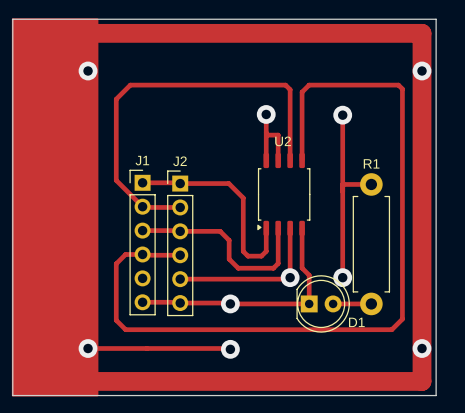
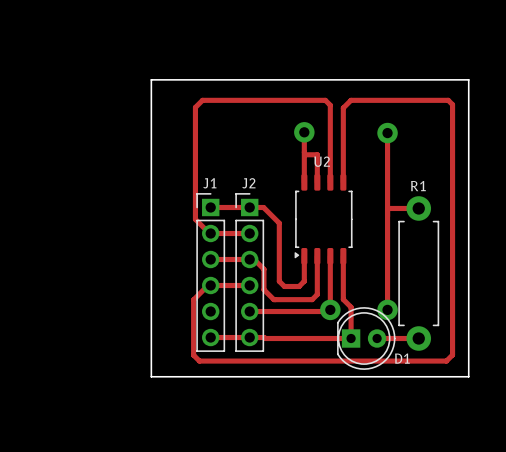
drawing: [11, 18, 99, 397] -> none
board edge: (12, 19) (436, 19) (436, 395) (12, 395) (12, 19) -> none
track: (55, 33) (422, 33) (422, 381) (41, 381) -> none
board edge: none -> (151, 79) (468, 79) (468, 376) (151, 376) (151, 79)
via: (88, 70) -> none
via: (422, 70) -> none
track: (172, 85) (130, 85) (116, 99) (116, 180) (143, 207) (179, 207) -> (202, 100) (195, 107) (195, 219) (209, 233)
J2 name: J2 (179, 161) -> J1 (209, 183)
track: (142, 182) (178, 182) -> (210, 233) (249, 233)
track: (142, 230) (178, 230) -> (210, 285) (249, 285)
J1: (142, 242) -> none
J2: none -> (249, 272)
track: (179, 255) (125, 254) (116, 263) (116, 320) (125, 329) (391, 329) (396, 324) -> (209, 285) (193, 299) (193, 355) (199, 361) (446, 361)
track: (180, 279) (216, 279) -> none
track: (142, 302) (178, 302) -> none
via: (230, 303) -> none
track: (88, 348) (230, 349) -> none
via: (88, 348) -> none
via: (422, 348) -> none
via: (230, 349) -> none

